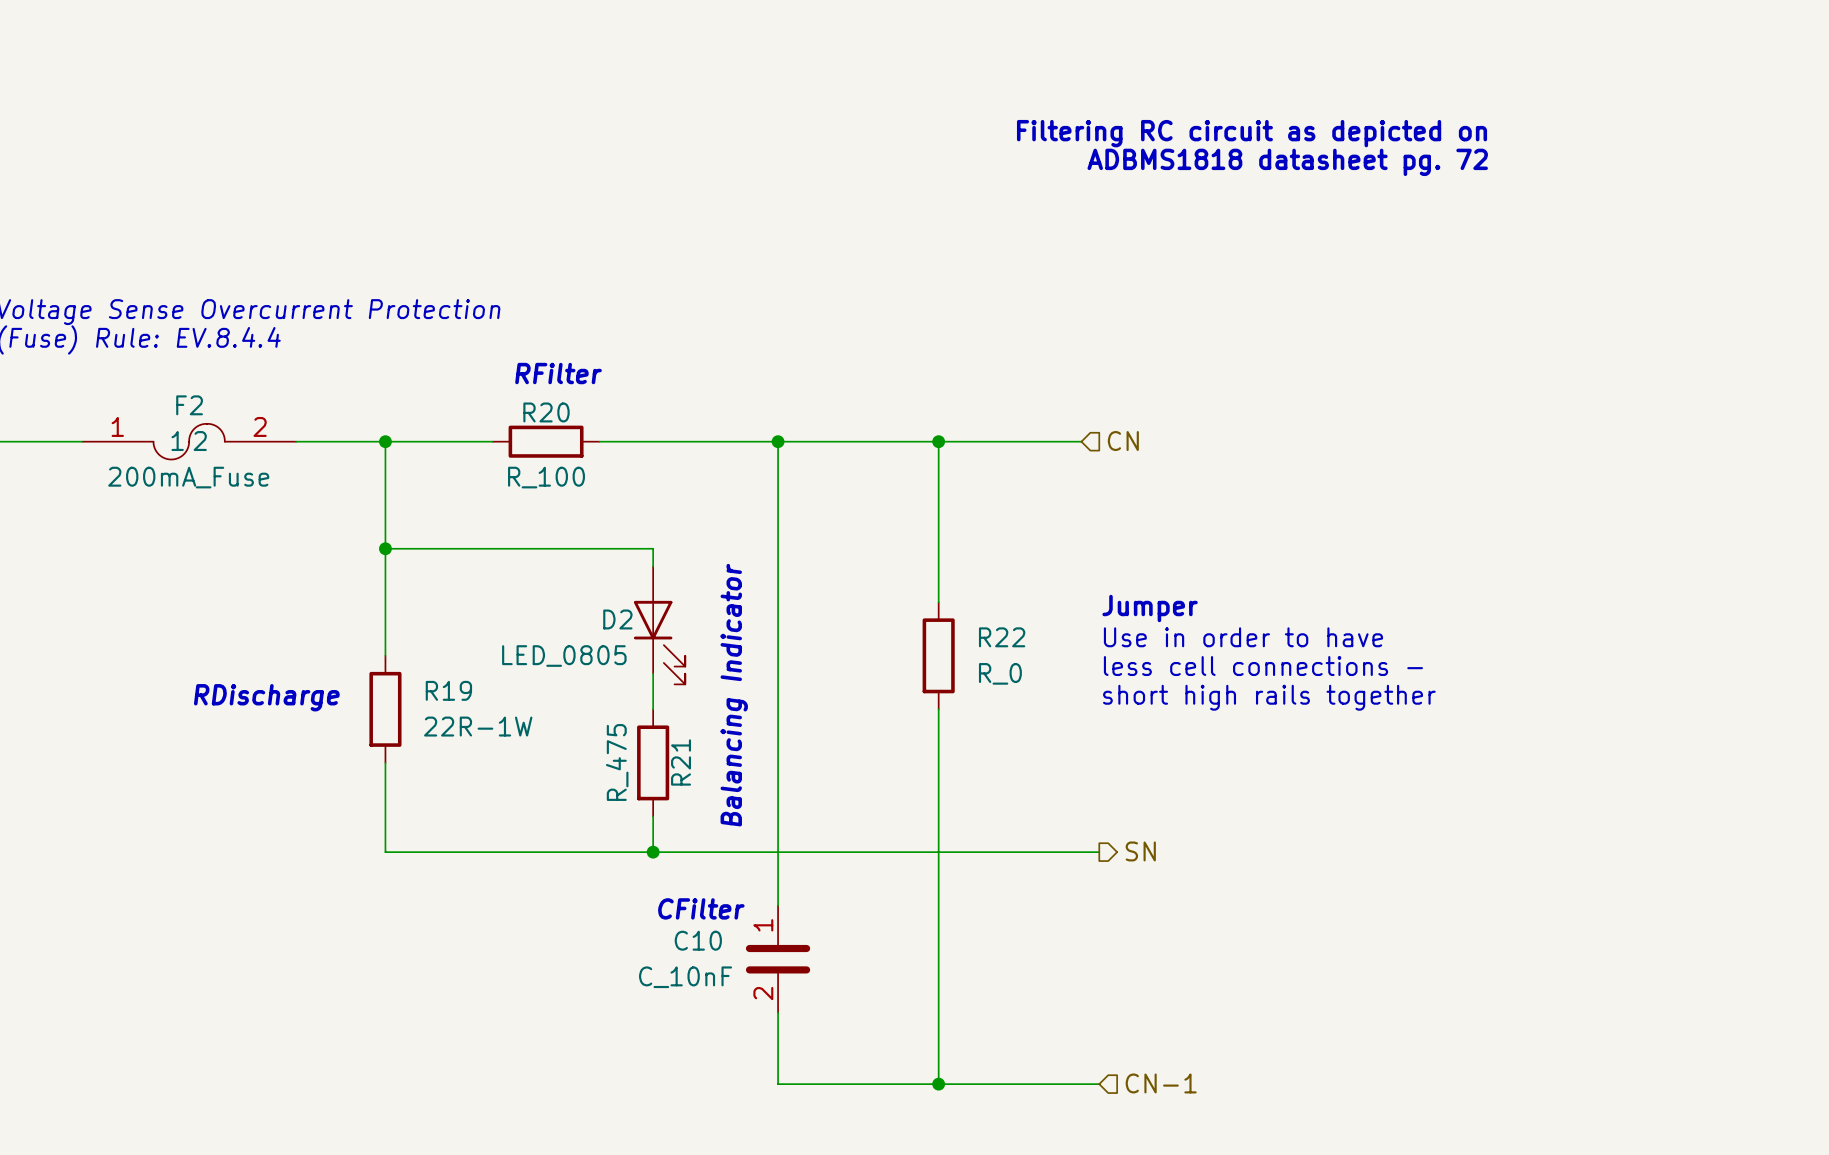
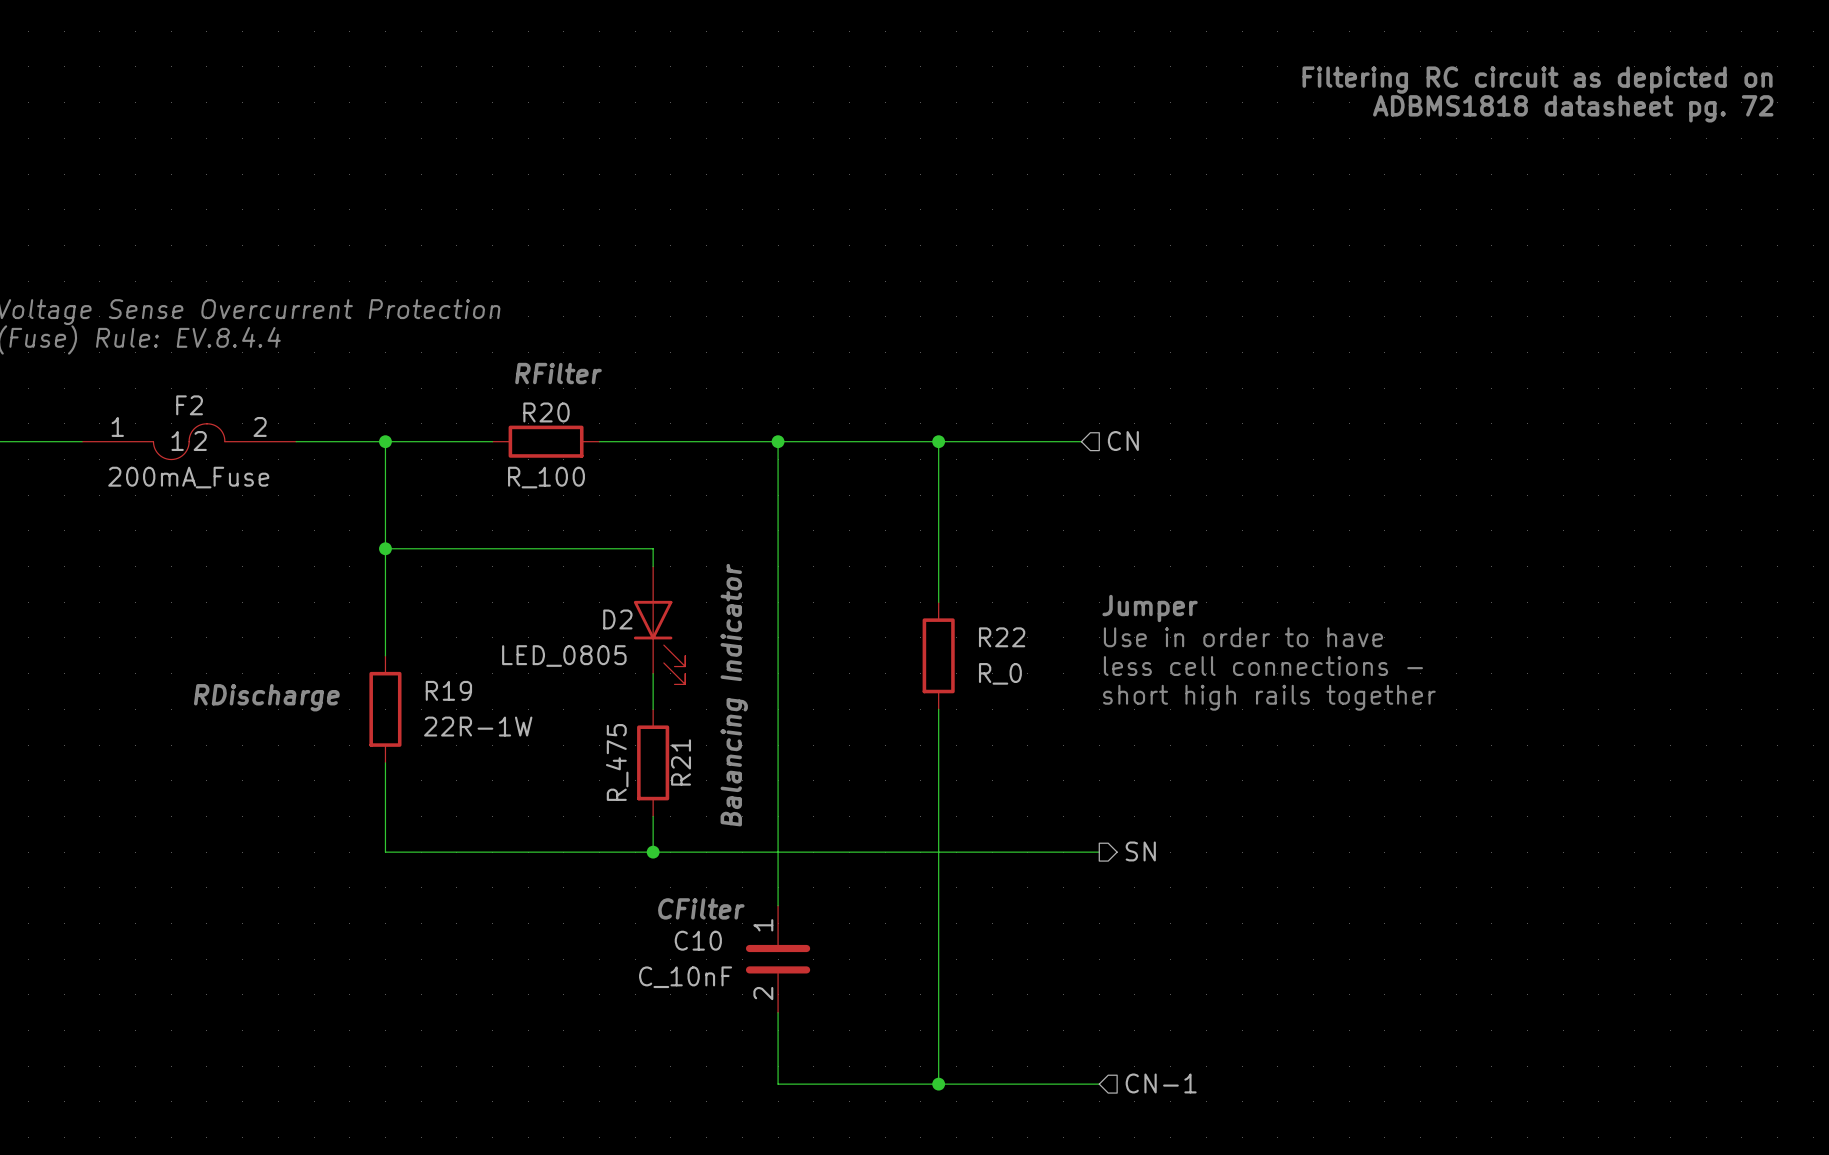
text position: Filtering RC circuit as depicted on (1252, 133) -> Filtering RC circuit as depicted on (1537, 80)
text position: ADBMS1818 datasheet pg. 72 (1287, 162) -> ADBMS1818 datasheet pg. 72 (1573, 108)

